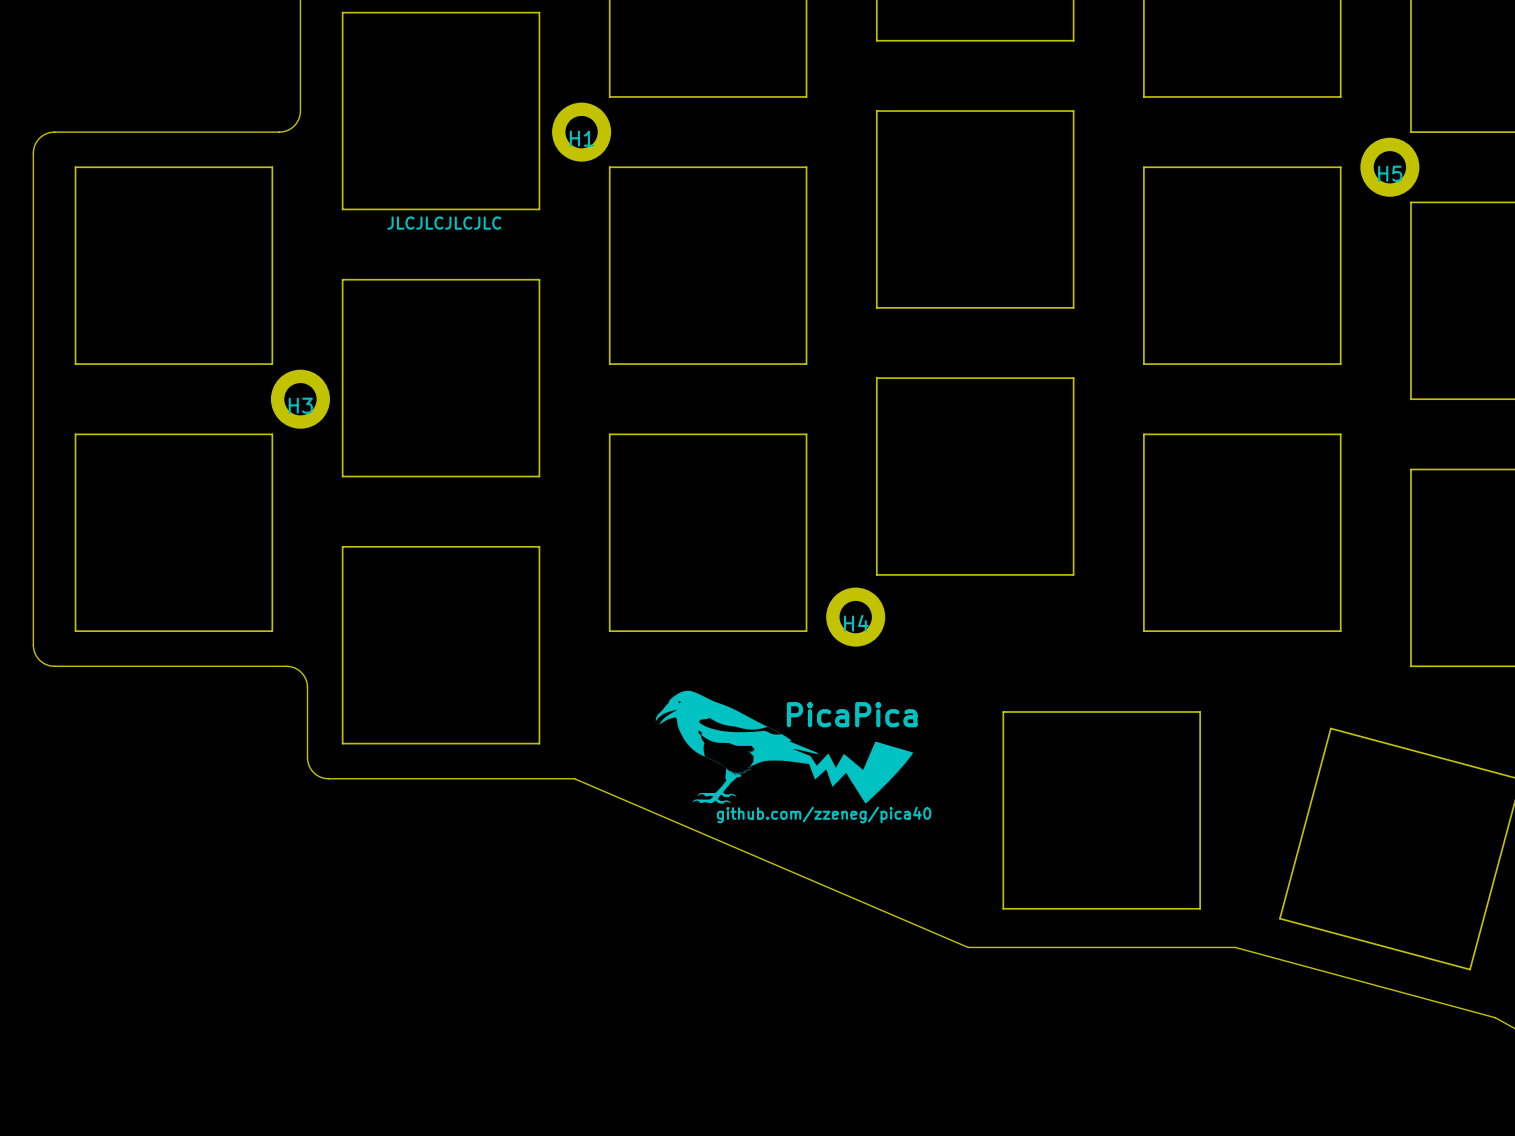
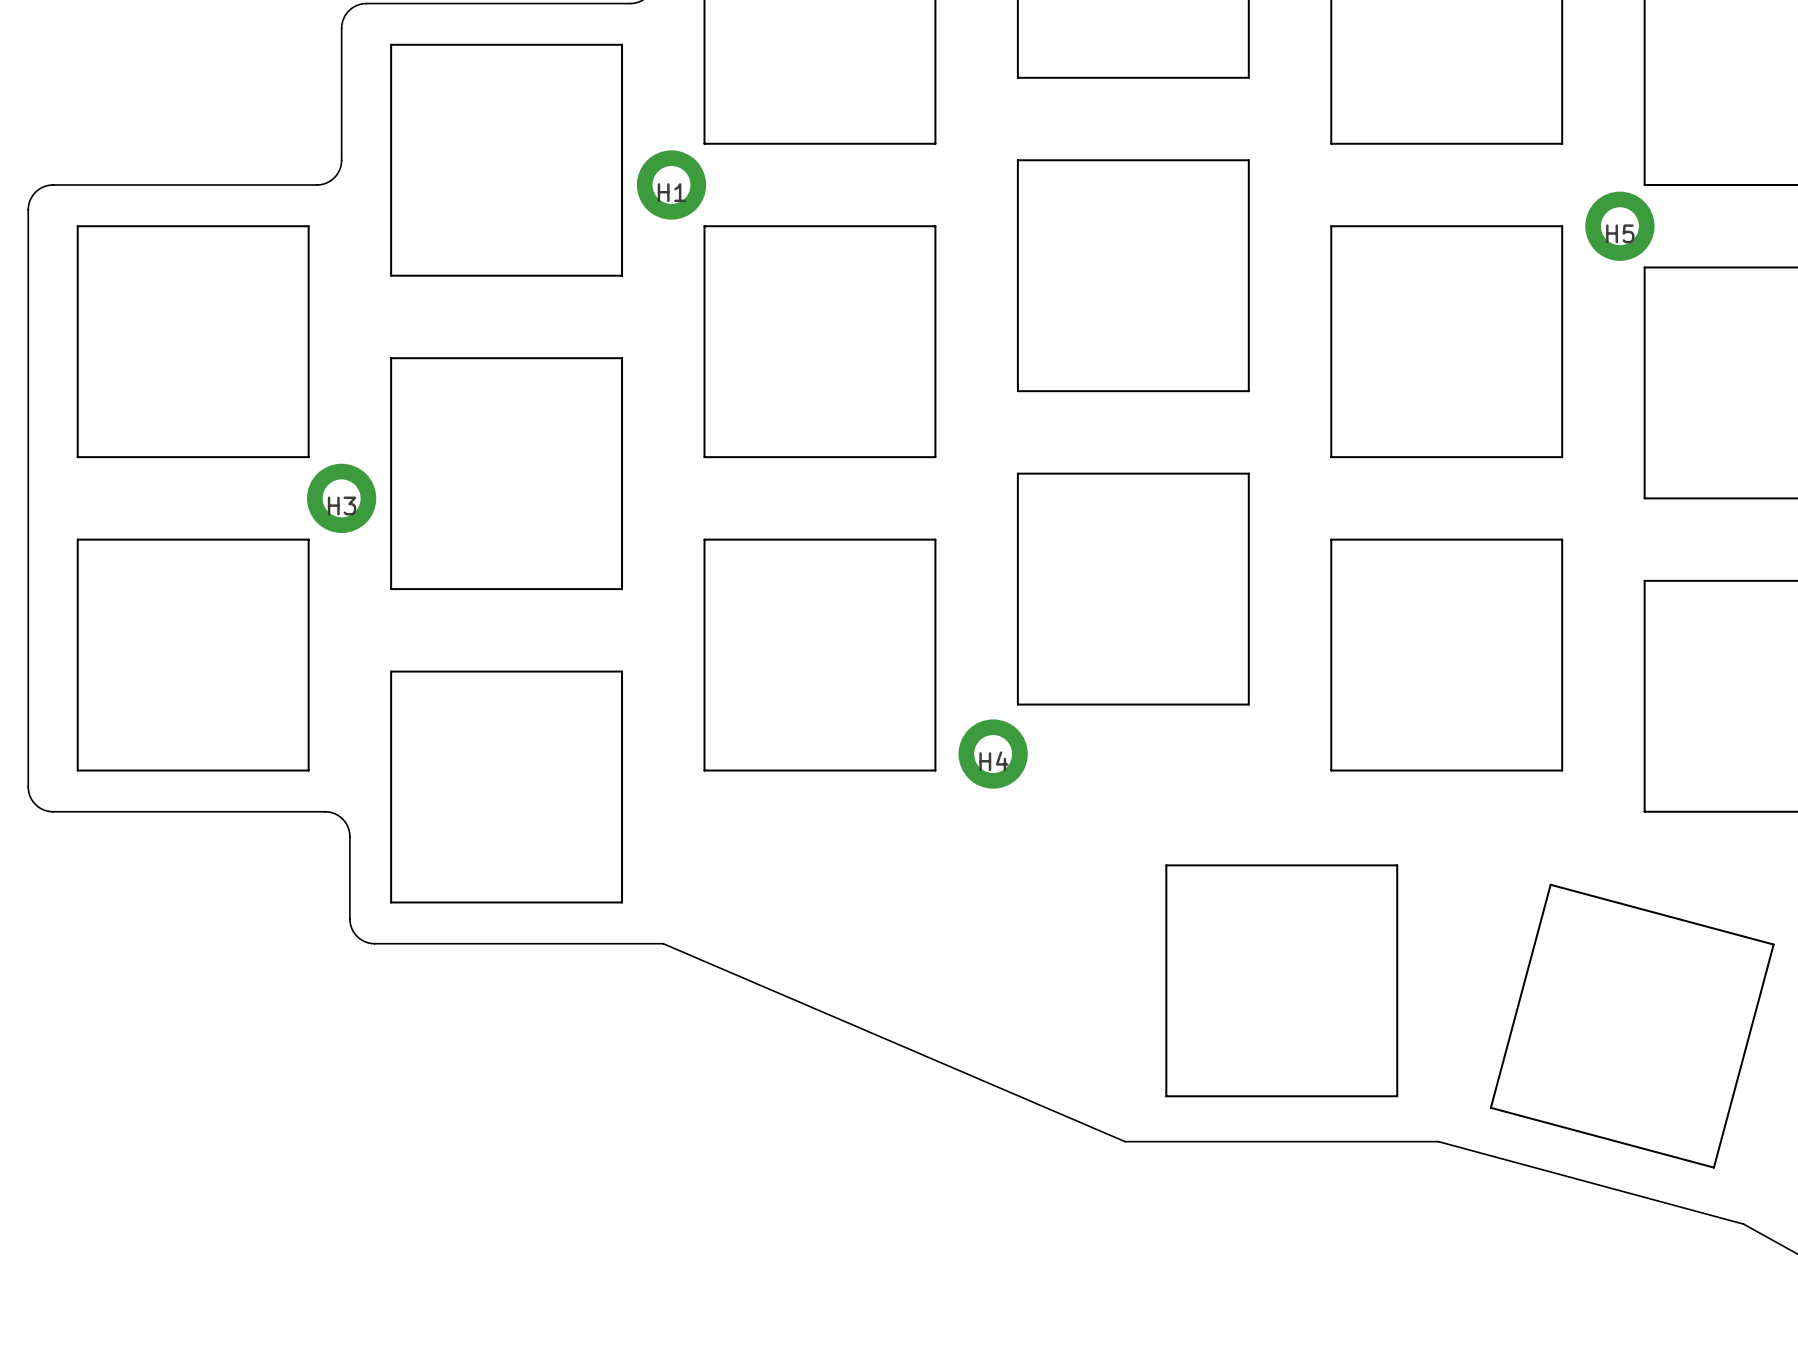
text: JLCJLCJLCJLC (444, 223) -> none
drawing: [655, 690, 914, 804] -> none
text: PicaPica (852, 714) -> none
text: github.com/zzeneg/pica40 (824, 815) -> none

